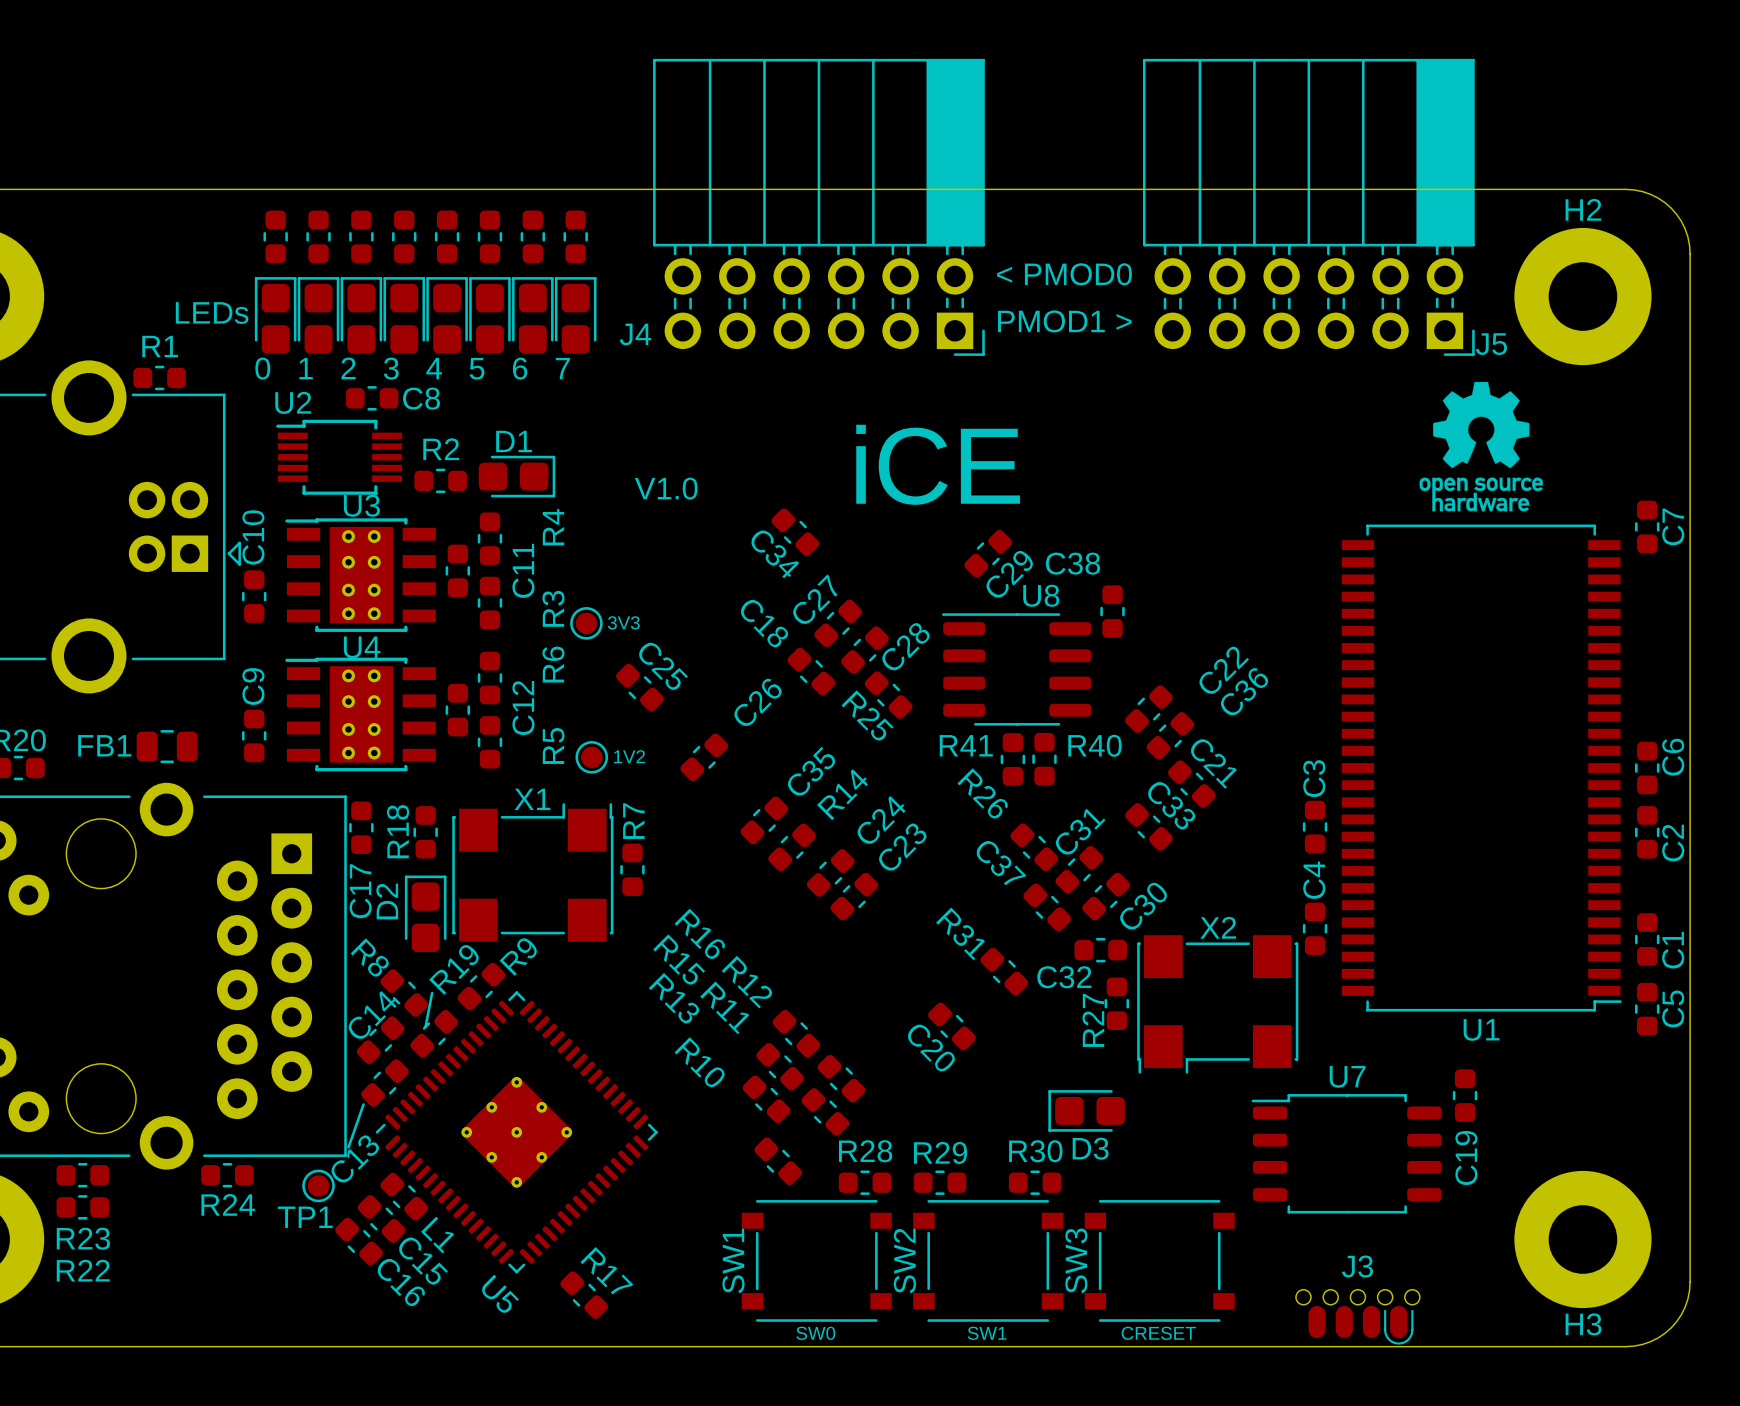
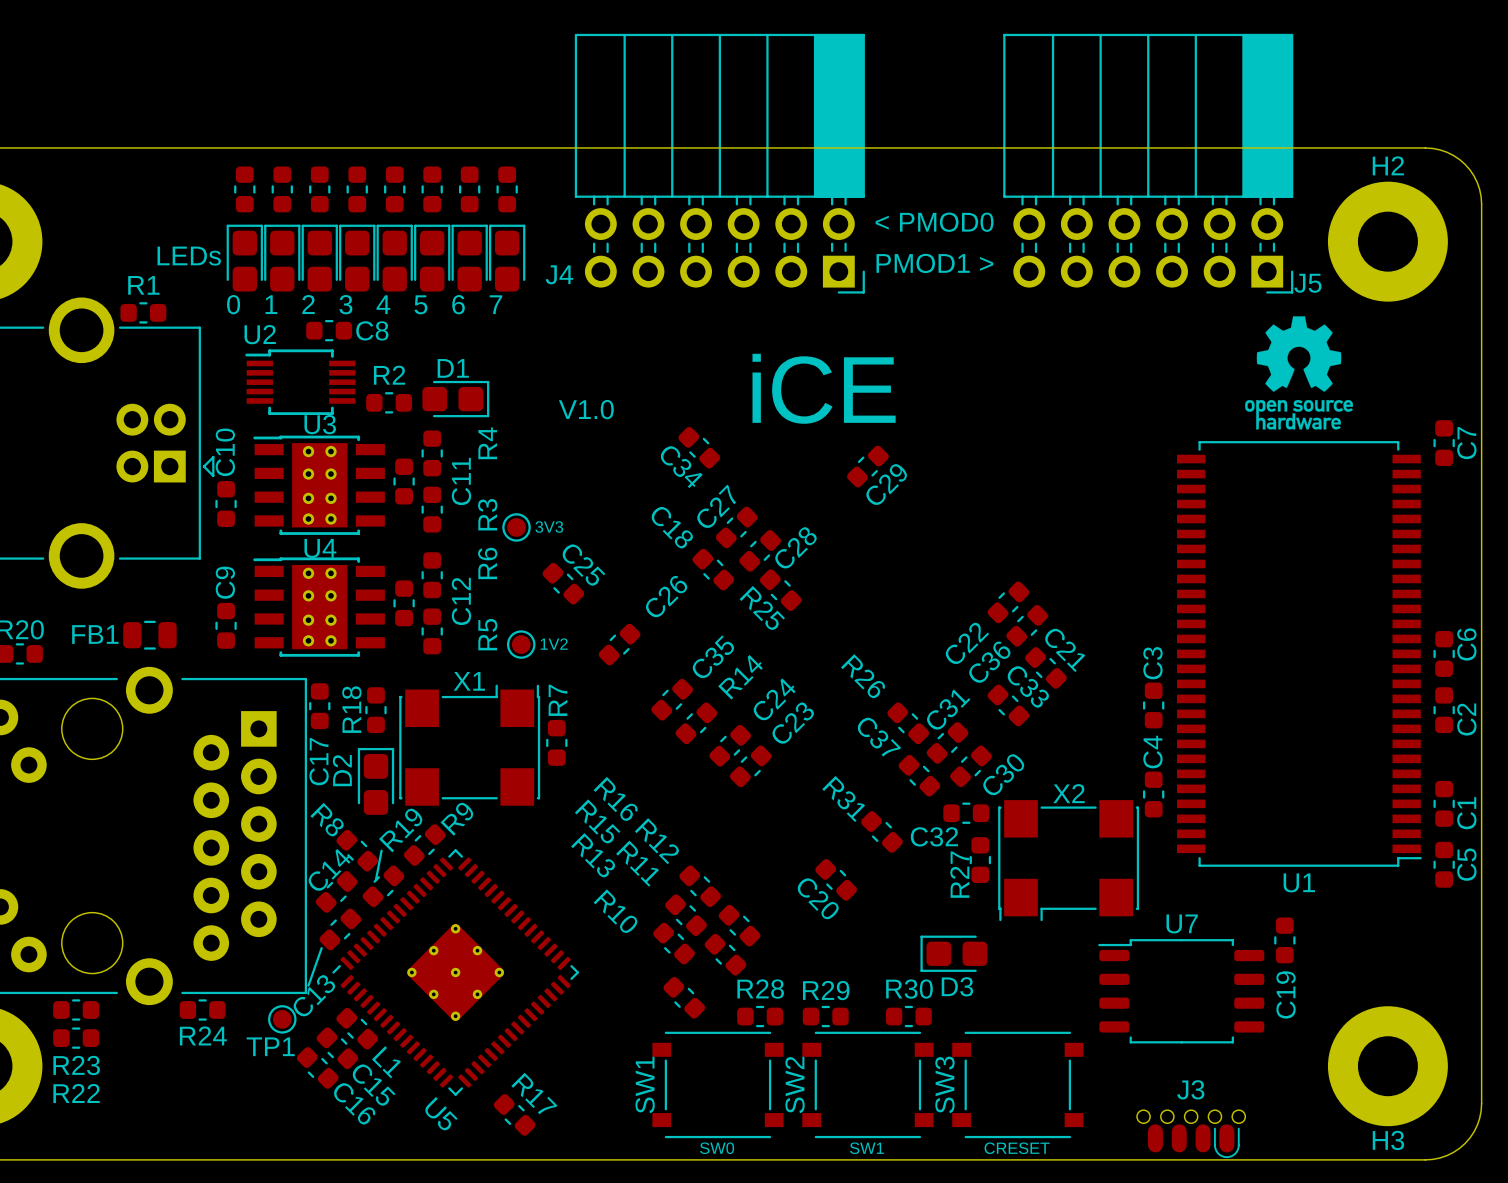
C38: (1112, 611) -> none
U8: (1016, 669) -> none
C22 name position: C22 (1224, 670) -> C22 (967, 643)
C36 name position: C36 (1244, 691) -> C36 (989, 661)
R41: (1012, 759) -> none
R40: (1044, 759) -> none

